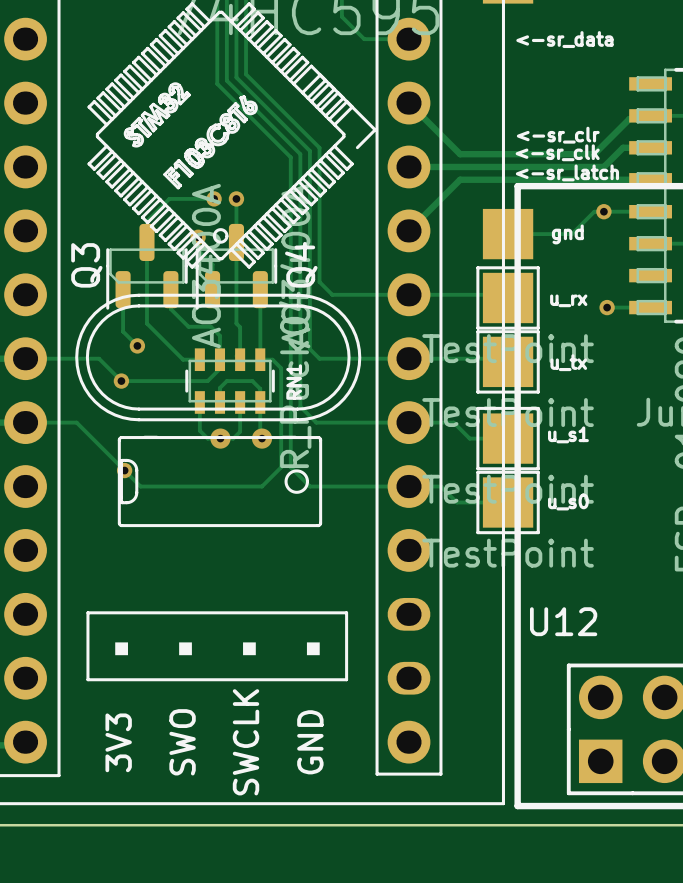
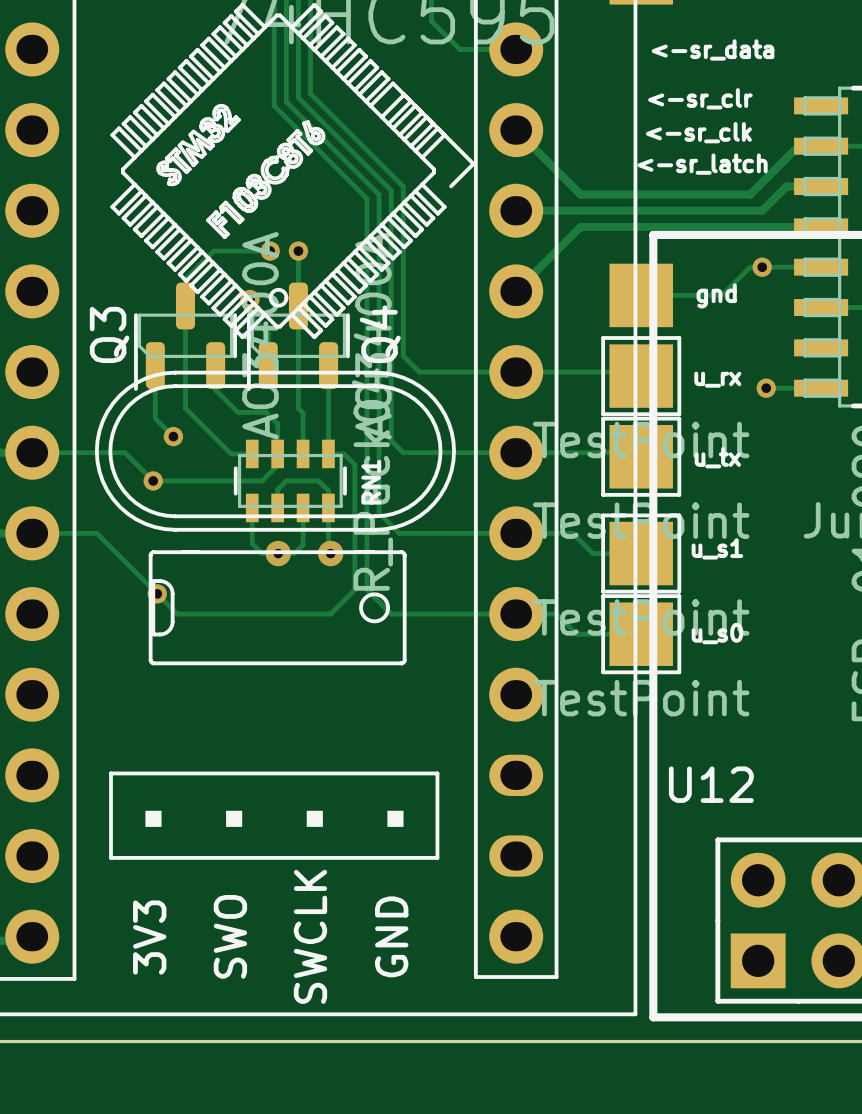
text: none -> <-sr_clr (700, 98)
text: <-sr_clr (558, 135) -> <-sr_latch (702, 164)
text position: <-sr_clk (557, 152) -> <-sr_clk (698, 132)
text: <-sr_latch (567, 172) -> none

